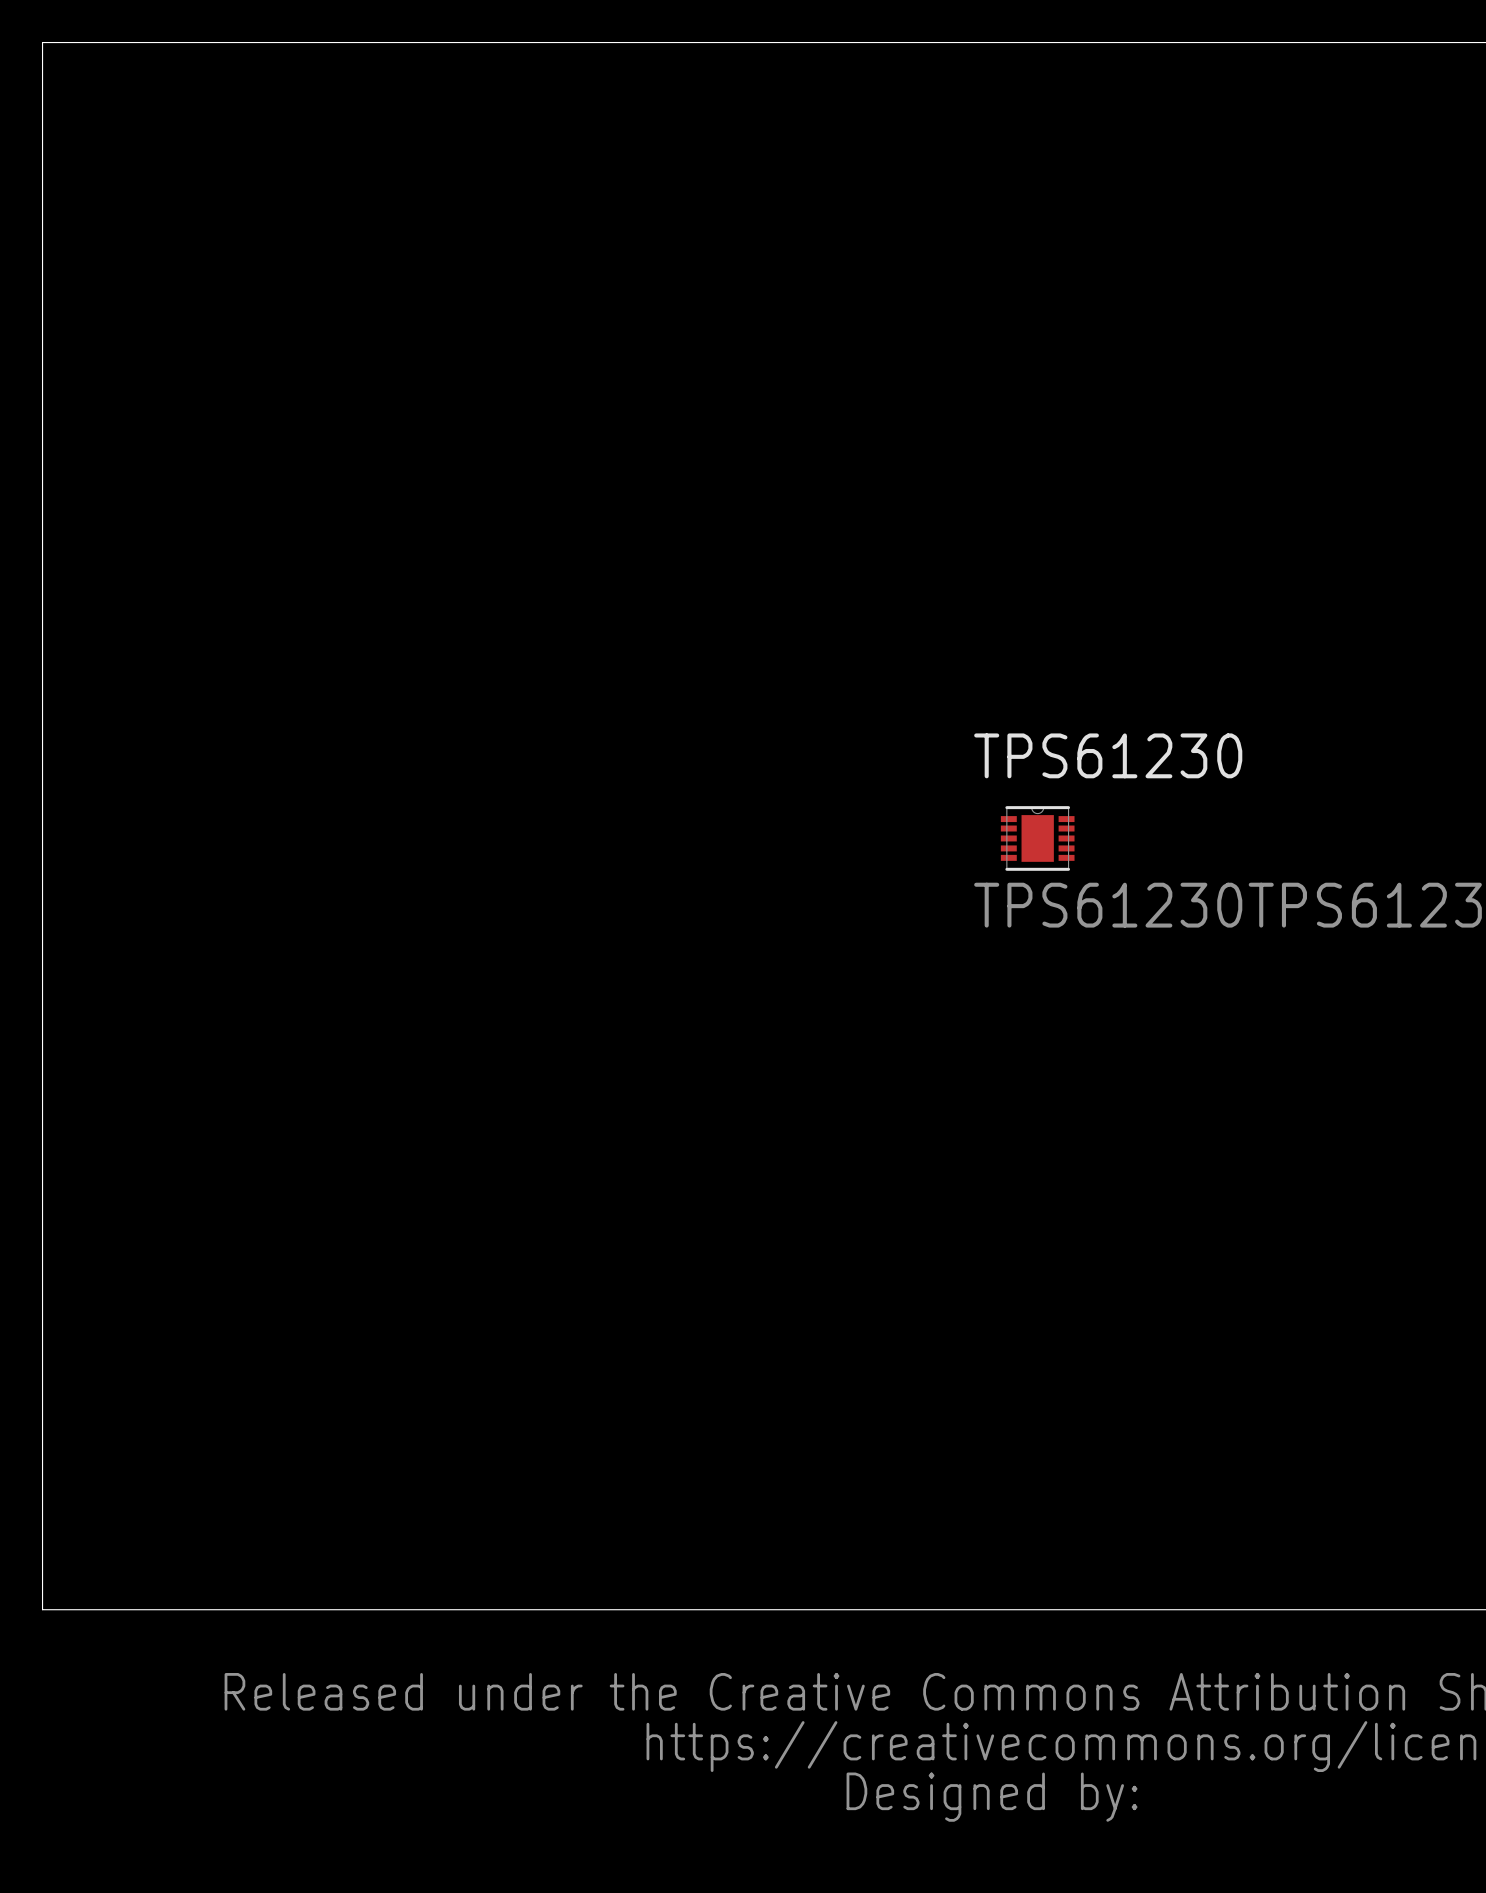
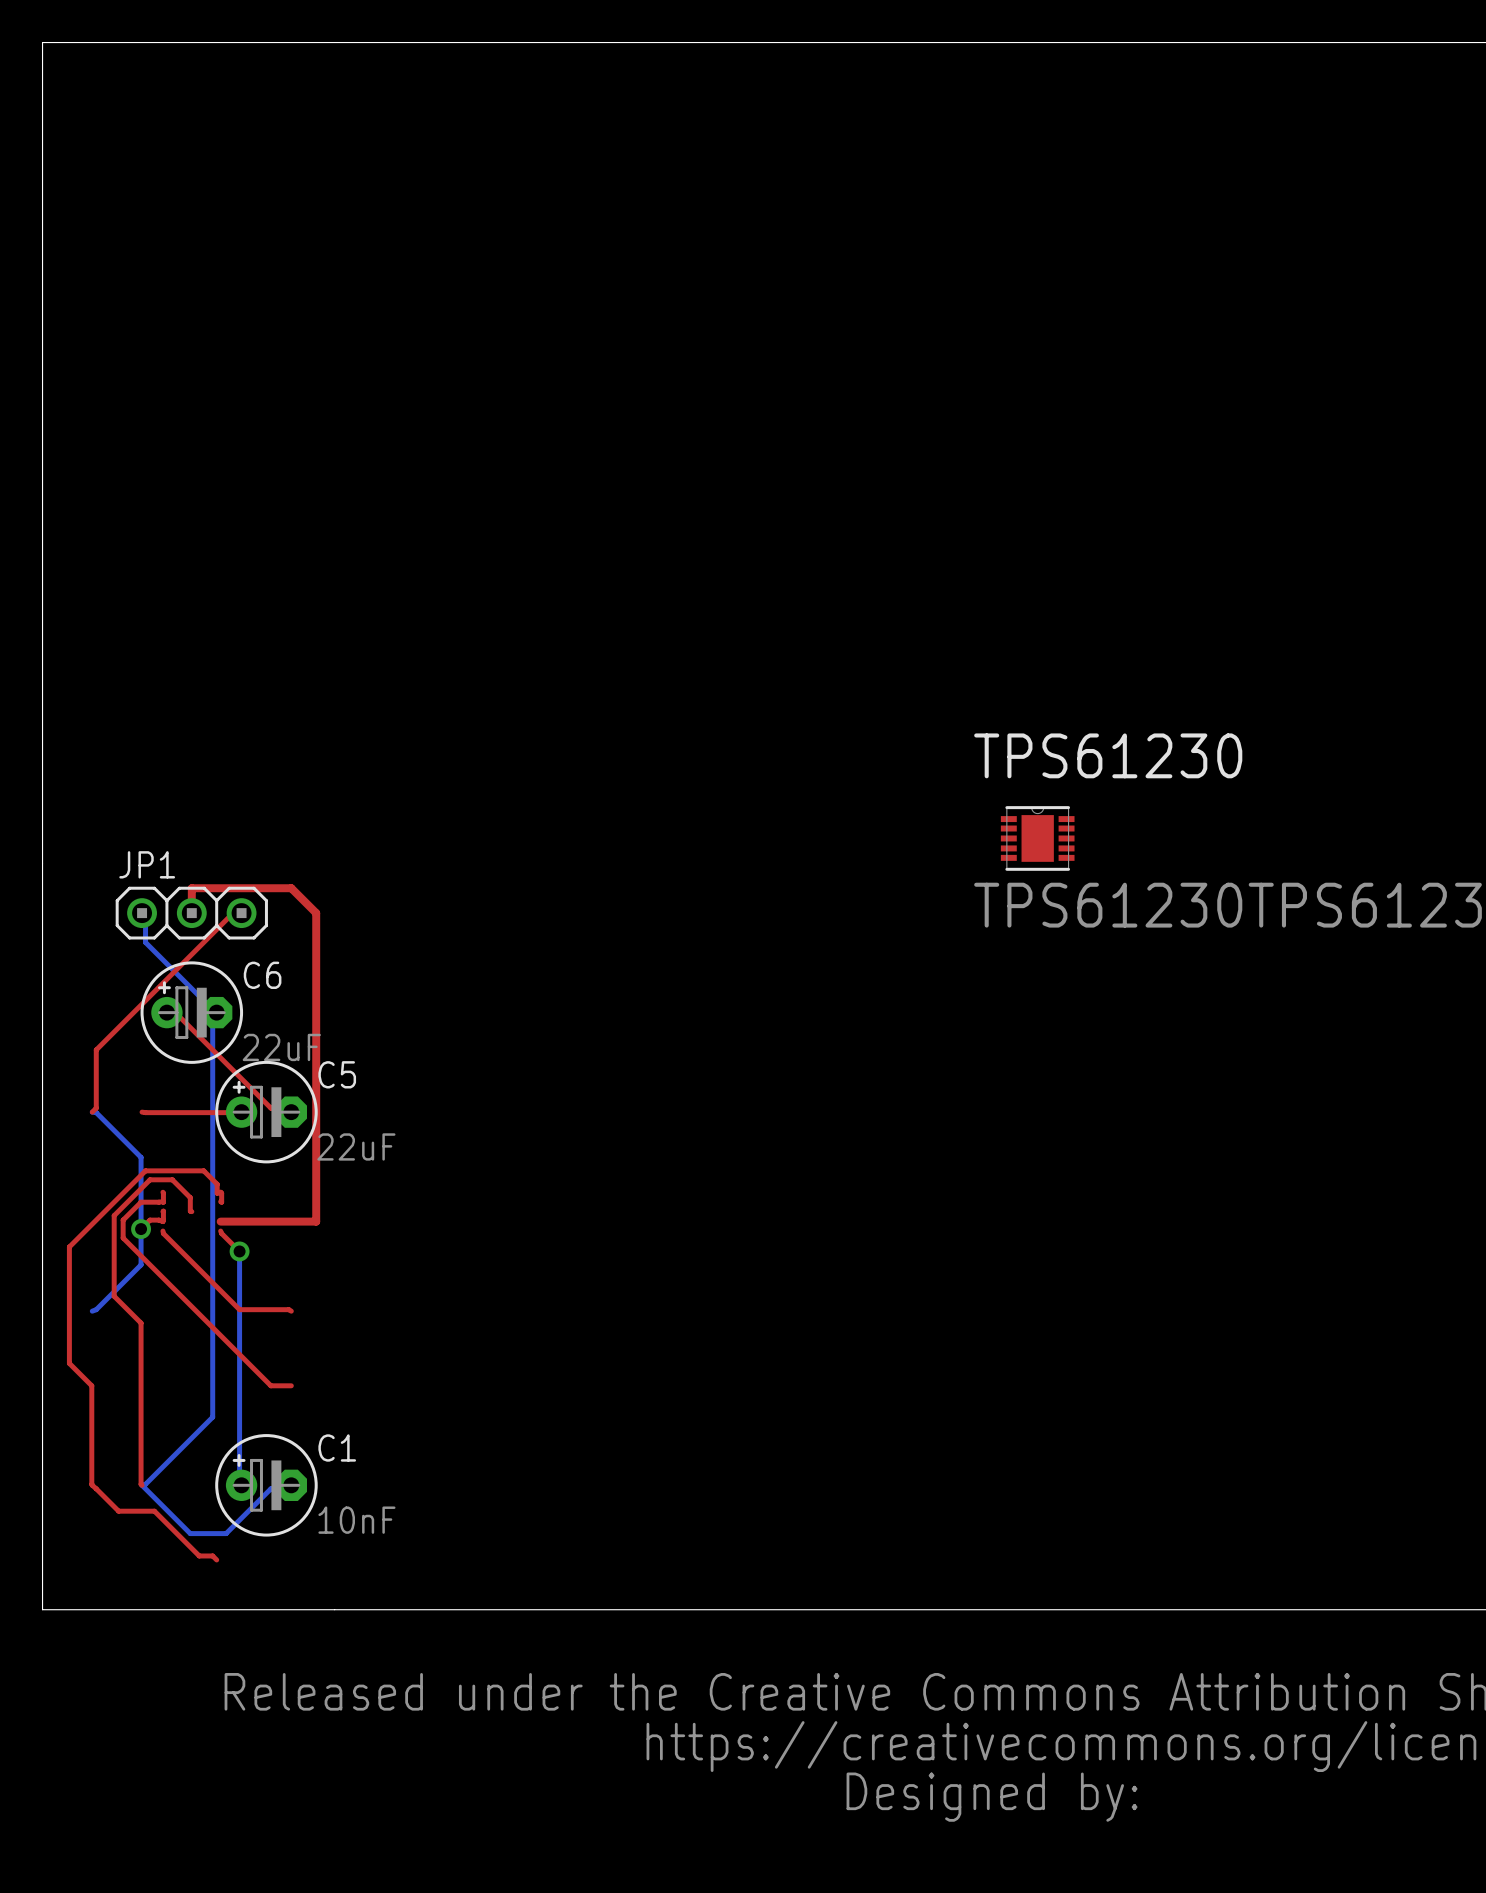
bottom track: none -> (142, 913) (145, 915) (145, 942) (216, 1012) (212, 1014) (212, 1417) (145, 1484) (142, 1485) (190, 1533) (226, 1533) (270, 1488) (288, 1488) (291, 1485)
top track: none -> (191, 913) (191, 888) (291, 888) (316, 913) (316, 1221) (220, 1221)
JP1: none -> (191, 913)
top track: none -> (241, 913) (239, 915) (230, 915) (96, 1049) (96, 1108) (92, 1112)
top track: none -> (166, 1012) (176, 1014) (270, 1108) (288, 1108) (291, 1112)
C6: none -> 22uF (191, 1012)
bottom track: none -> (92, 1112) (96, 1112) (141, 1157) (141, 1264) (96, 1309) (92, 1311)
top track: none -> (142, 1112) (241, 1112)
C5: none -> 22uF (266, 1112)
top track: none -> (162, 1192) (163, 1202) (141, 1202) (123, 1220) (123, 1238) (270, 1385) (291, 1385)
top track: none -> (220, 1201) (221, 1193) (217, 1193) (217, 1184) (203, 1170) (145, 1170) (69, 1246) (69, 1363) (91, 1385) (91, 1484) (118, 1511) (154, 1511) (199, 1555) (212, 1555) (216, 1559)
top track: none -> (162, 1211) (162, 1221) (150, 1220) (141, 1229)
top track: none -> (191, 1211) (190, 1197) (172, 1179) (150, 1179) (114, 1215) (114, 1296) (141, 1323) (142, 1485)
via: none -> (141, 1229)
top track: none -> (162, 1231) (239, 1309) (291, 1311)
top track: none -> (220, 1231) (239, 1251)
bottom track: none -> (239, 1251) (239, 1484) (241, 1485)
via: none -> (239, 1251)
C1: none -> 10nF (266, 1485)

